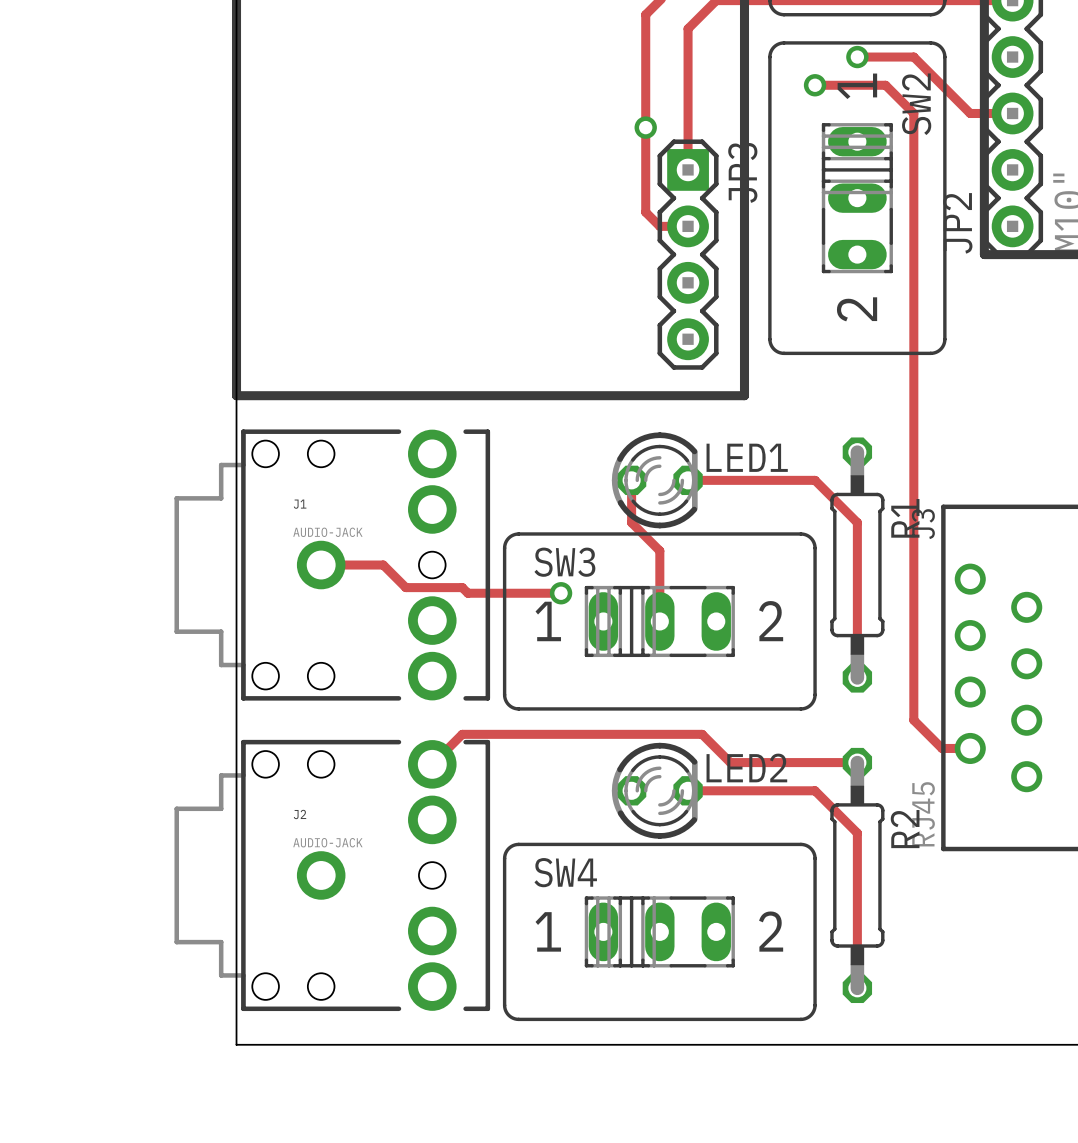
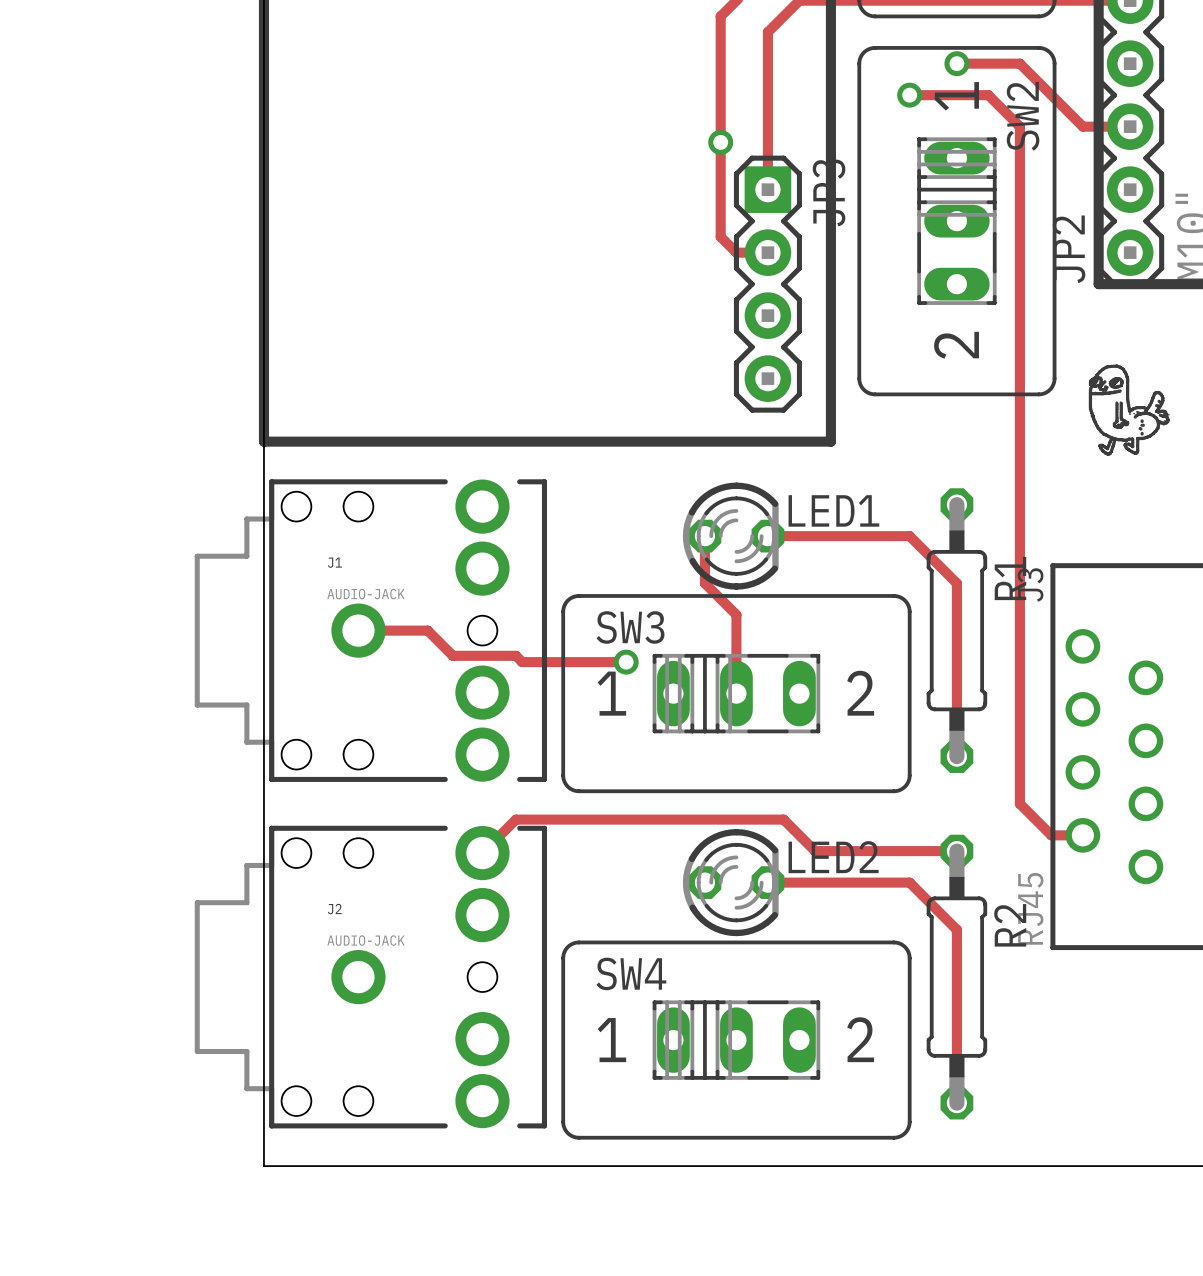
drawing: none -> [1088, 364, 1170, 456]

